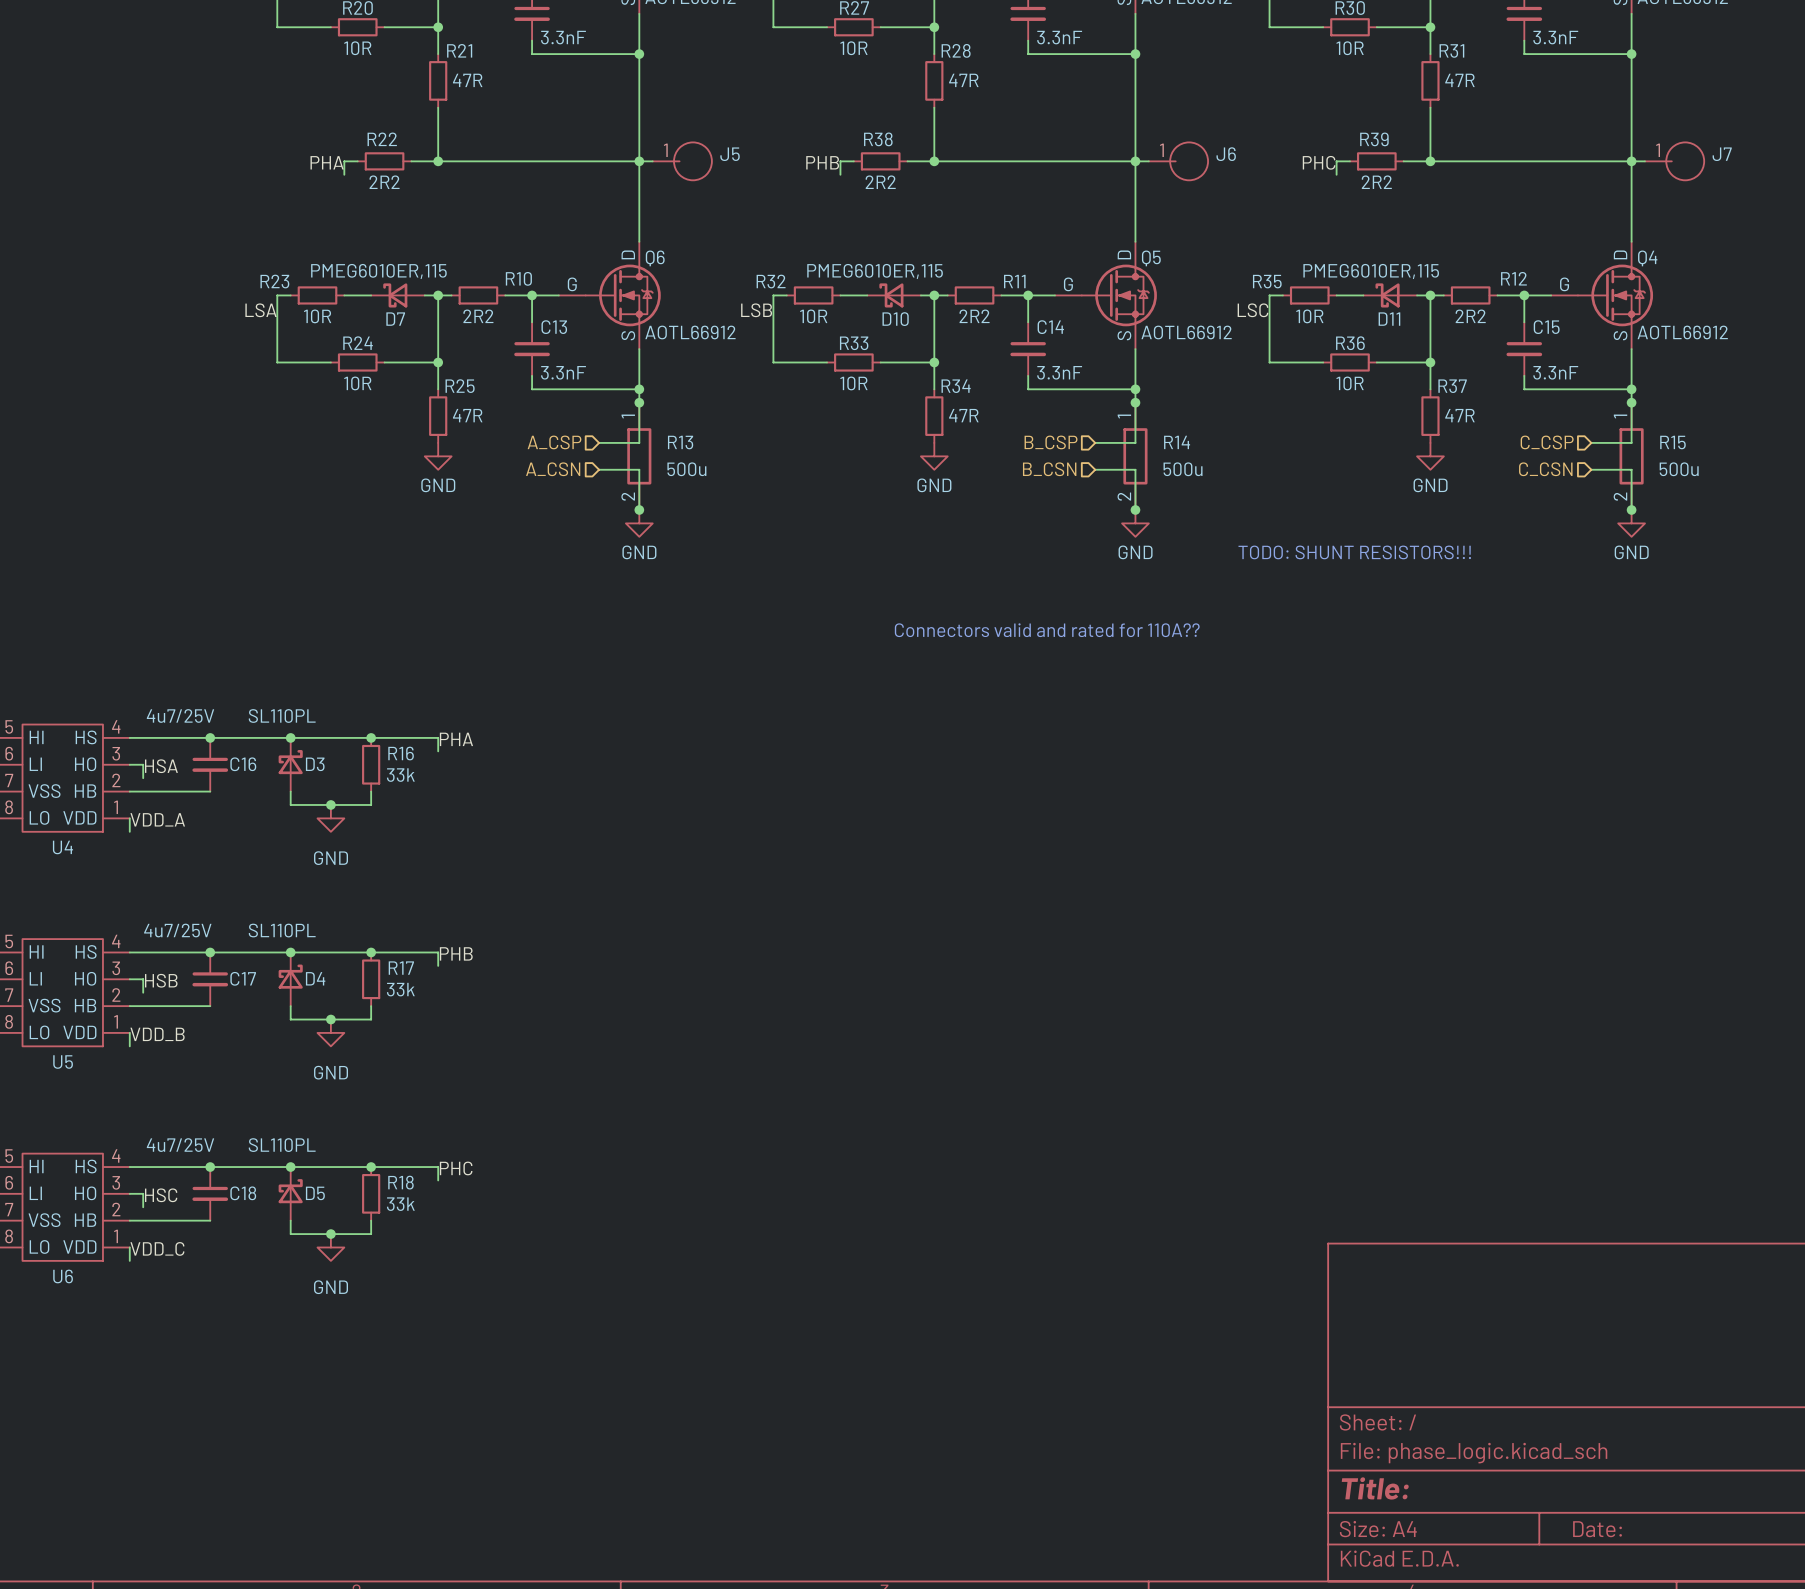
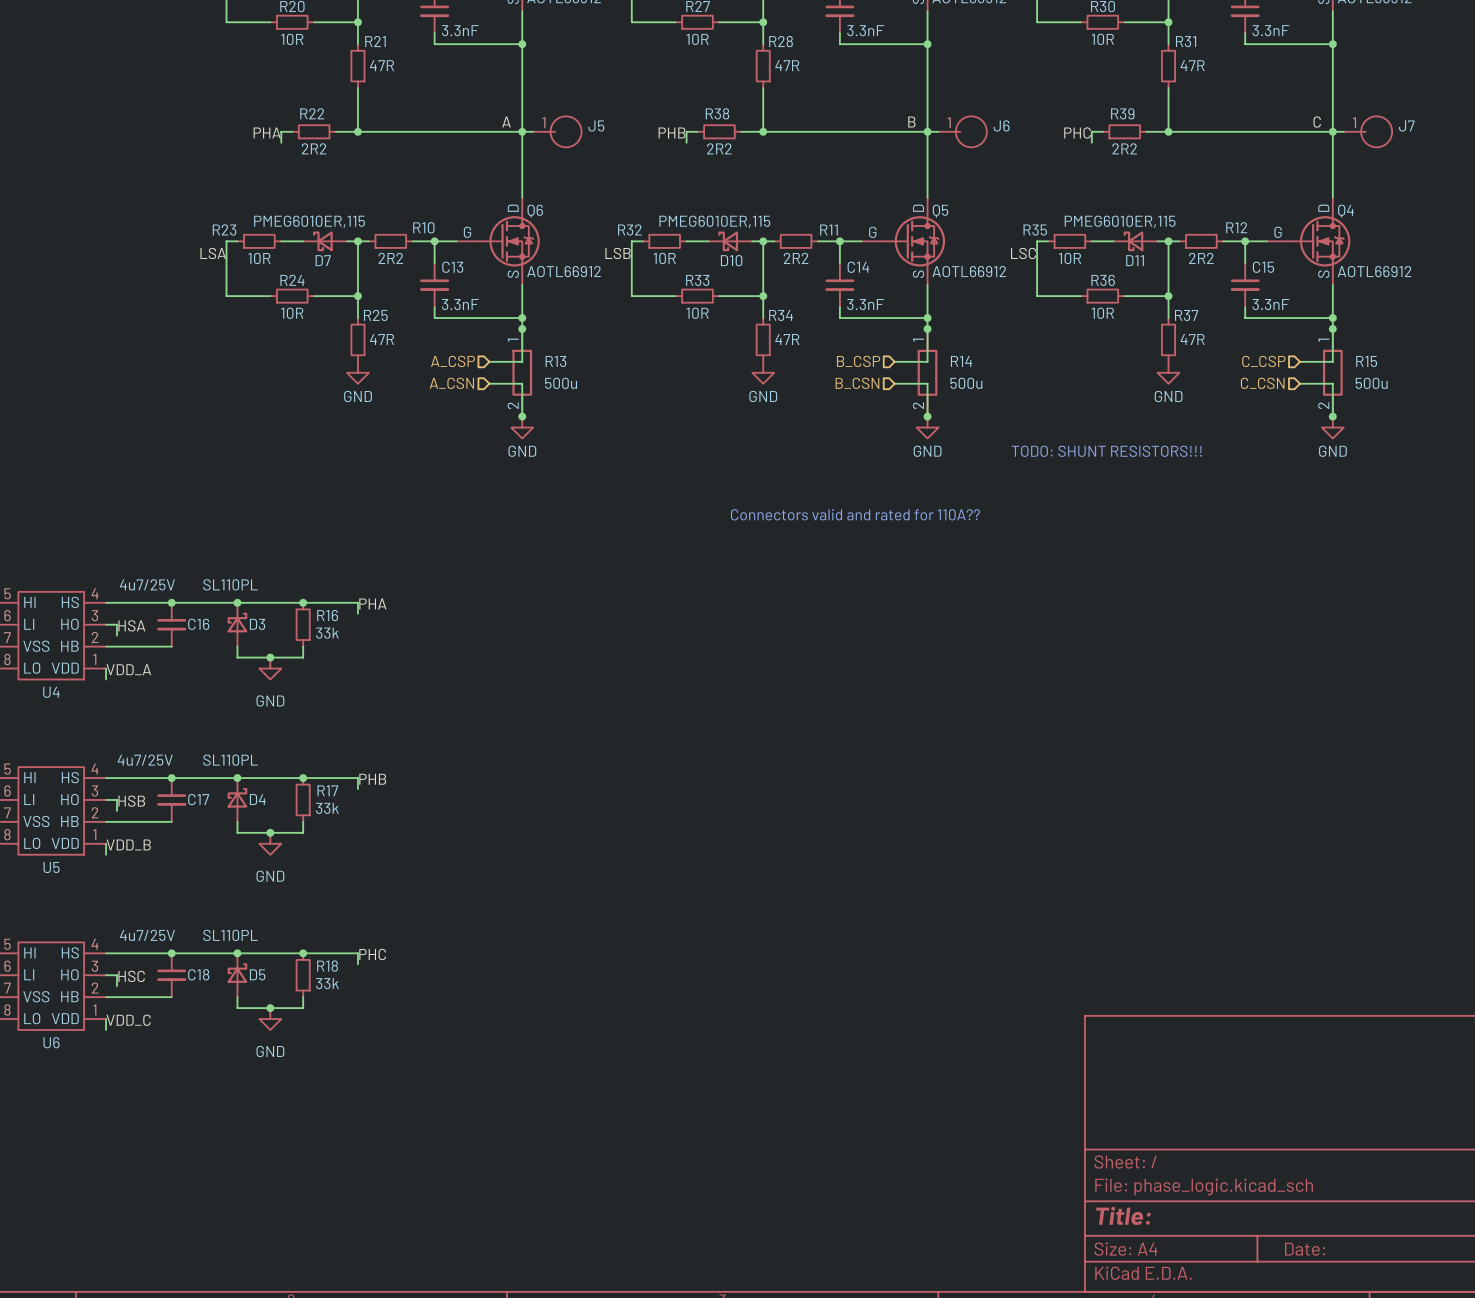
label: none -> A (506, 122)
label: none -> B (911, 122)
label: none -> C (1317, 122)

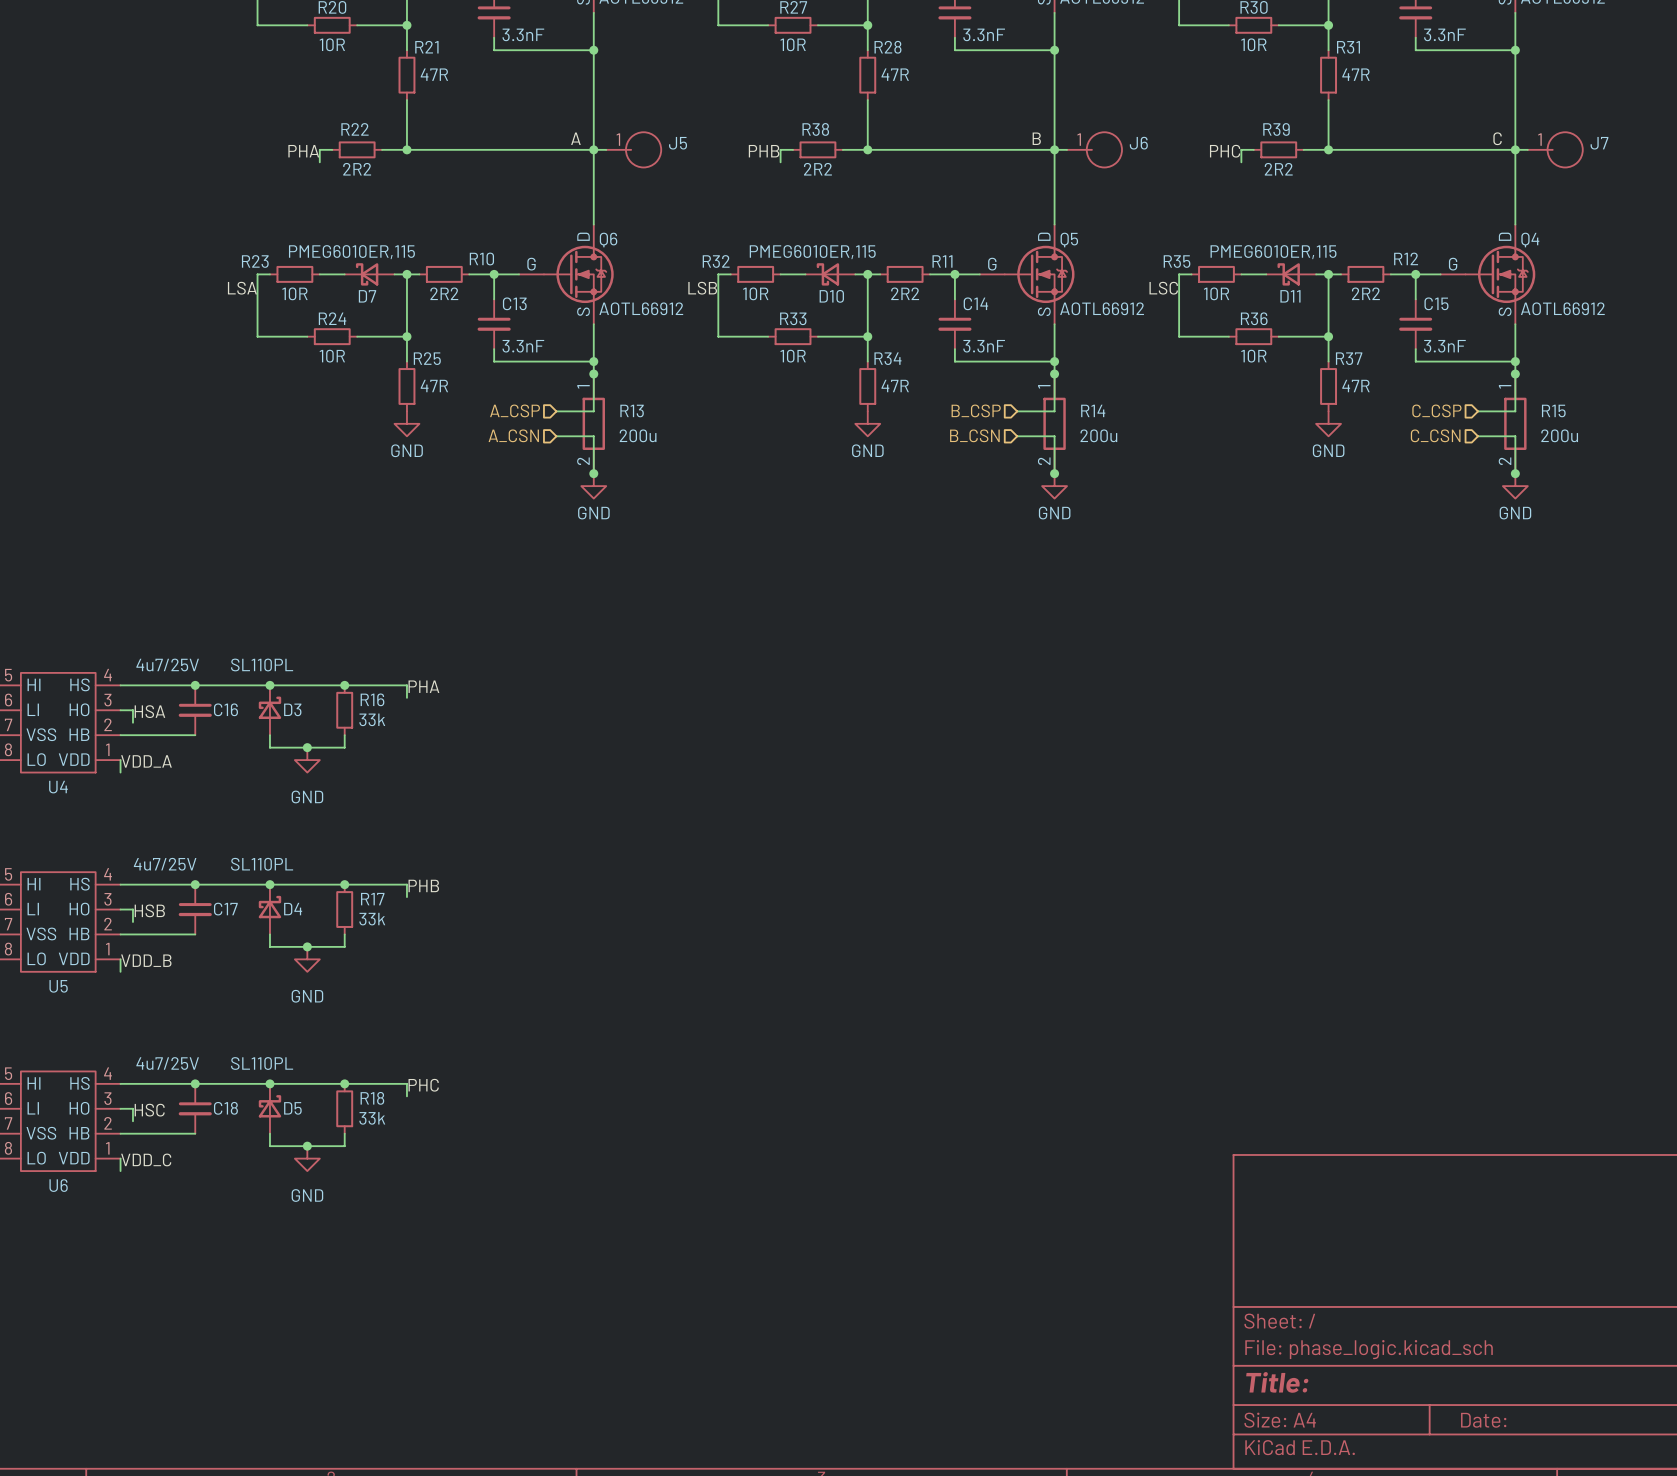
R13 value: 500u (561, 383) -> 200u (638, 435)
R14 value: 500u (966, 383) -> 200u (1098, 435)
R15 value: 500u (1371, 383) -> 200u (1559, 435)
text: TODO: SHUNT RESISTORS!!! (1106, 451) -> none
text: Connectors valid and rated for 110A?? (855, 514) -> none

